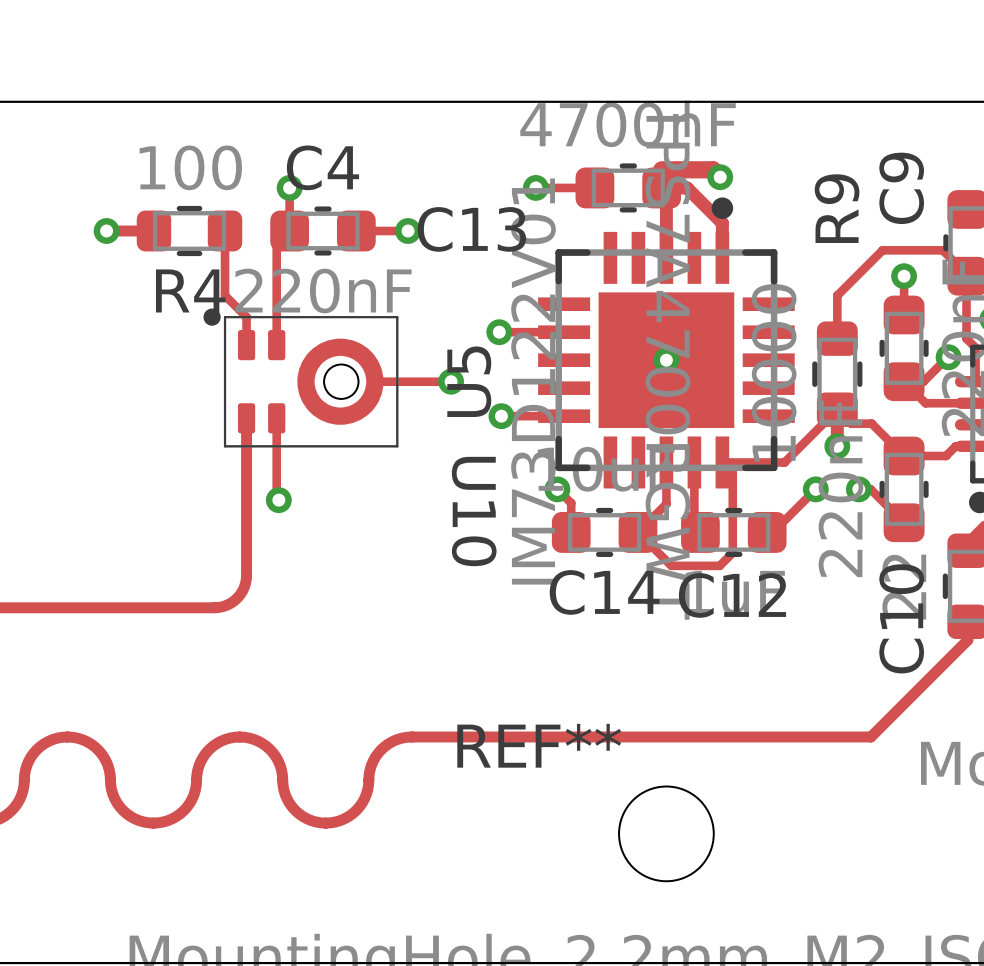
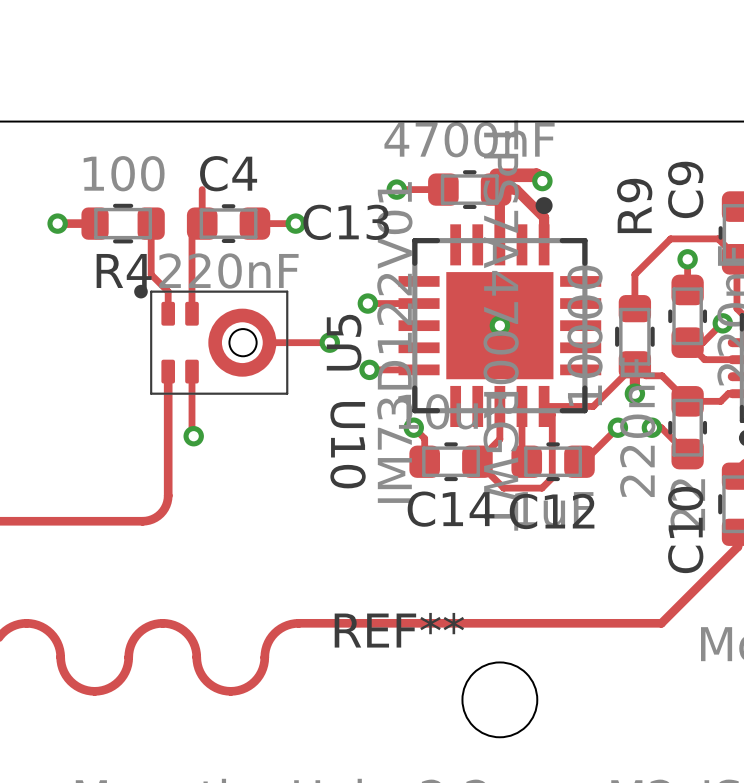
via: (289, 187) -> none

